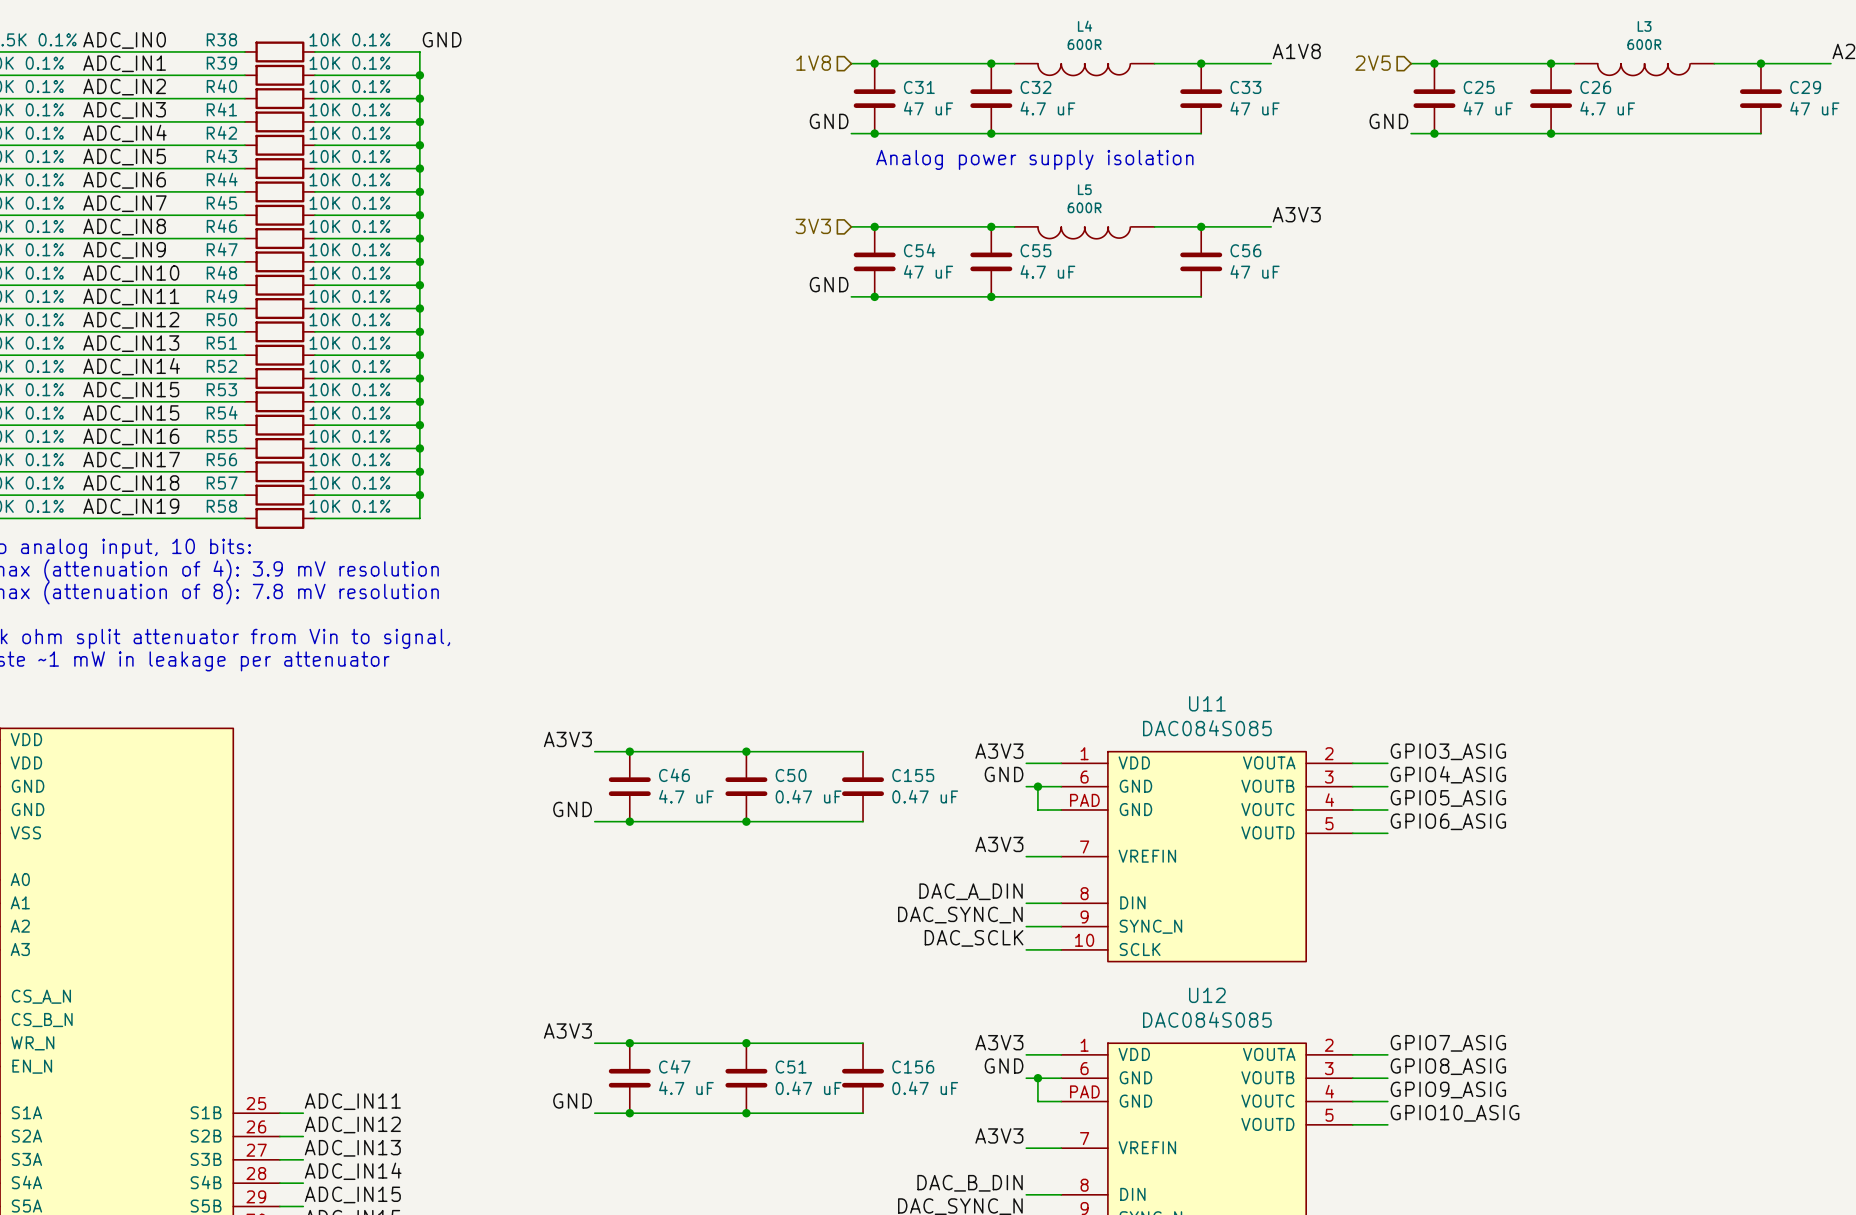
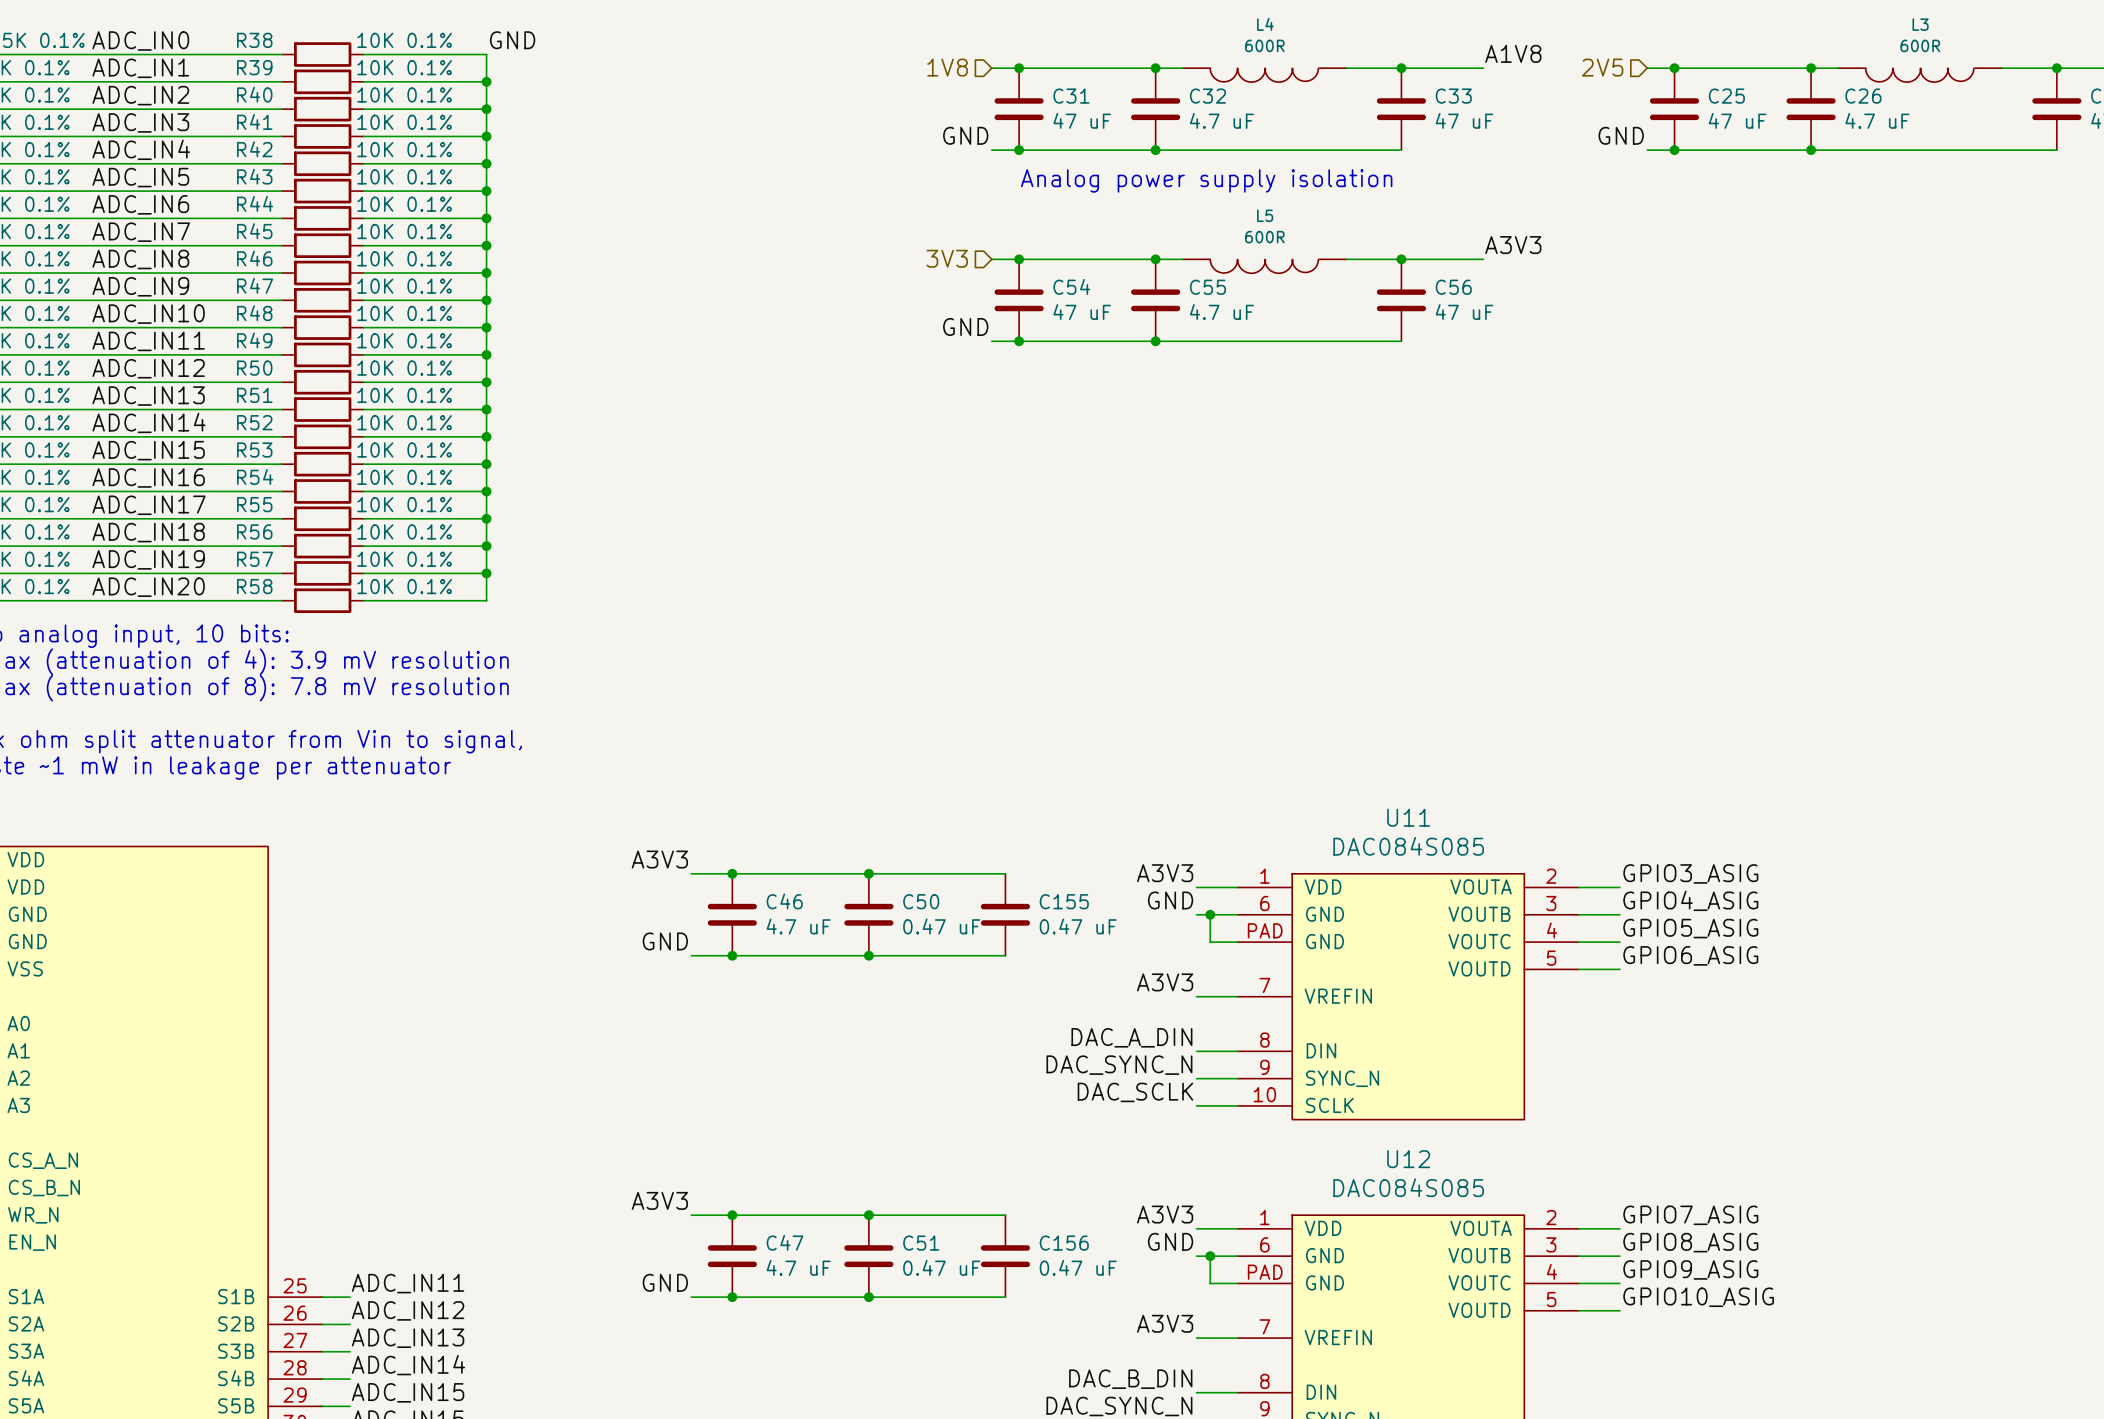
label: ADC_IN15 (131, 413) -> ADC_IN16 (148, 477)
label: ADC_IN16 (131, 436) -> ADC_IN17 (149, 505)
label: ADC_IN17 (131, 460) -> ADC_IN18 (148, 532)
label: ADC_IN18 (131, 483) -> ADC_IN19 (148, 559)
label: ADC_IN19 (131, 506) -> ADC_IN20 (148, 587)

